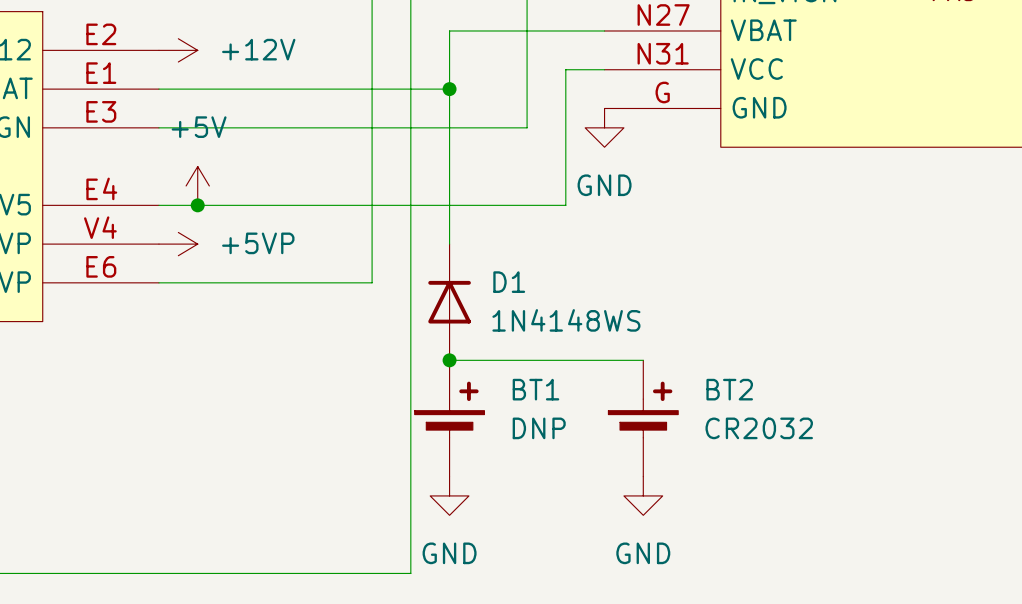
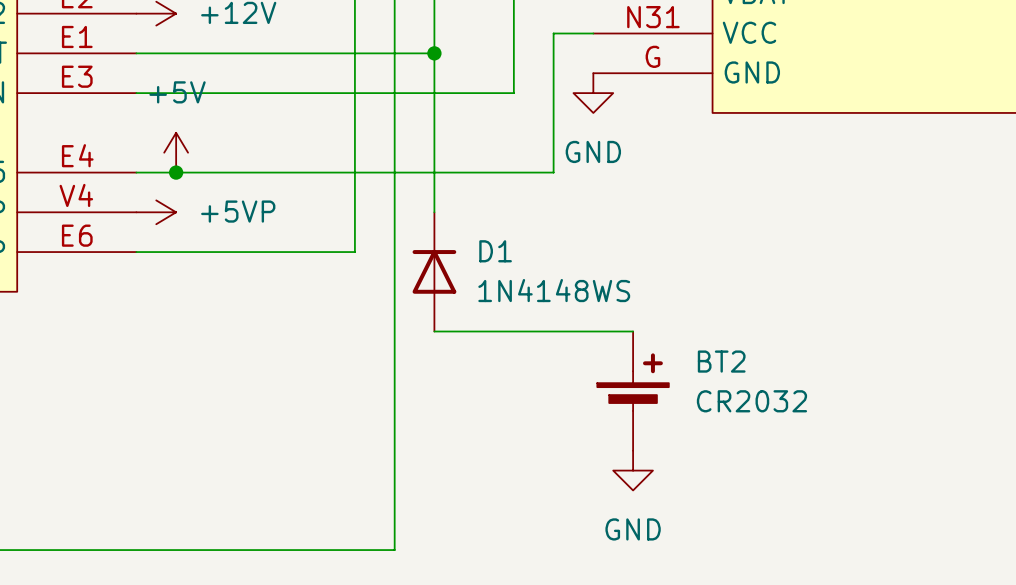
junction: (449, 360) -> none
BT1: DNP (449, 418) -> none
power symbol: GND (449, 495) -> none

